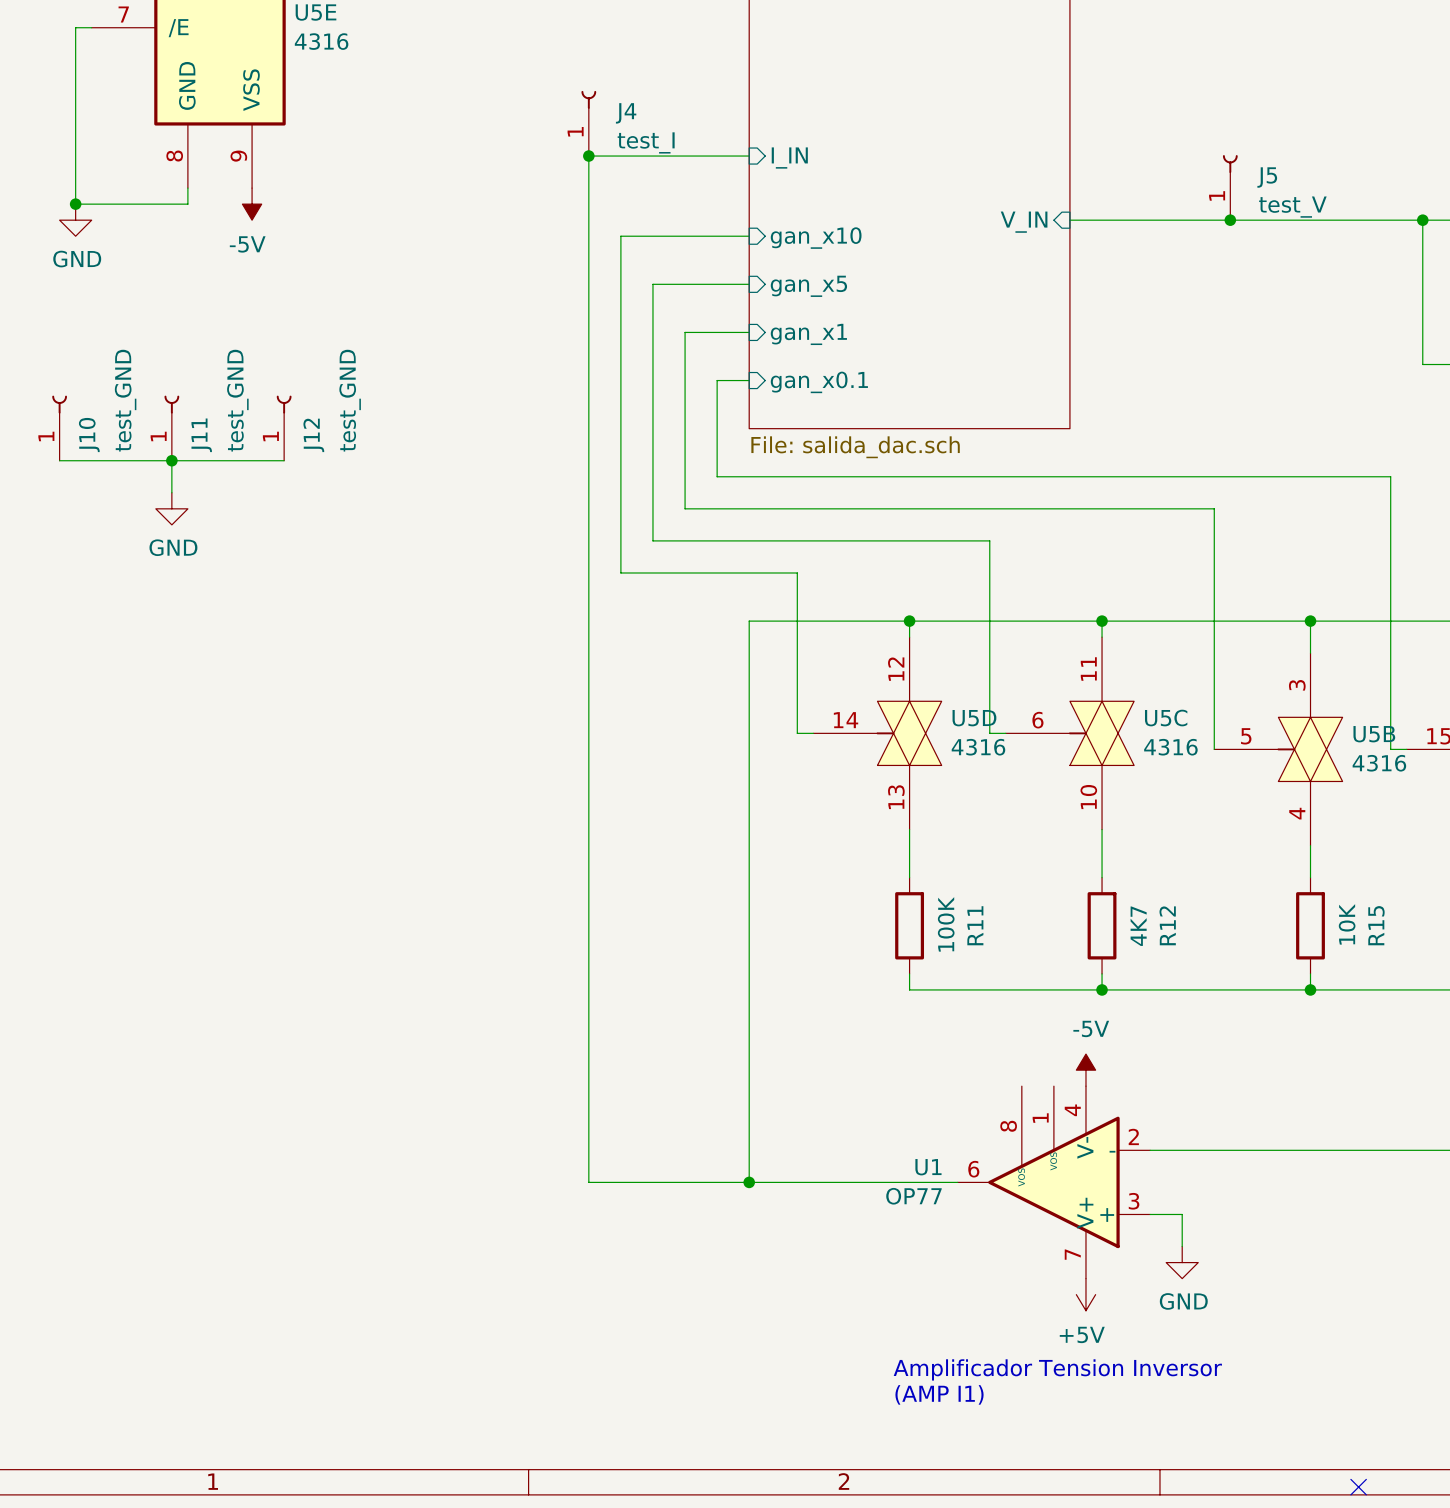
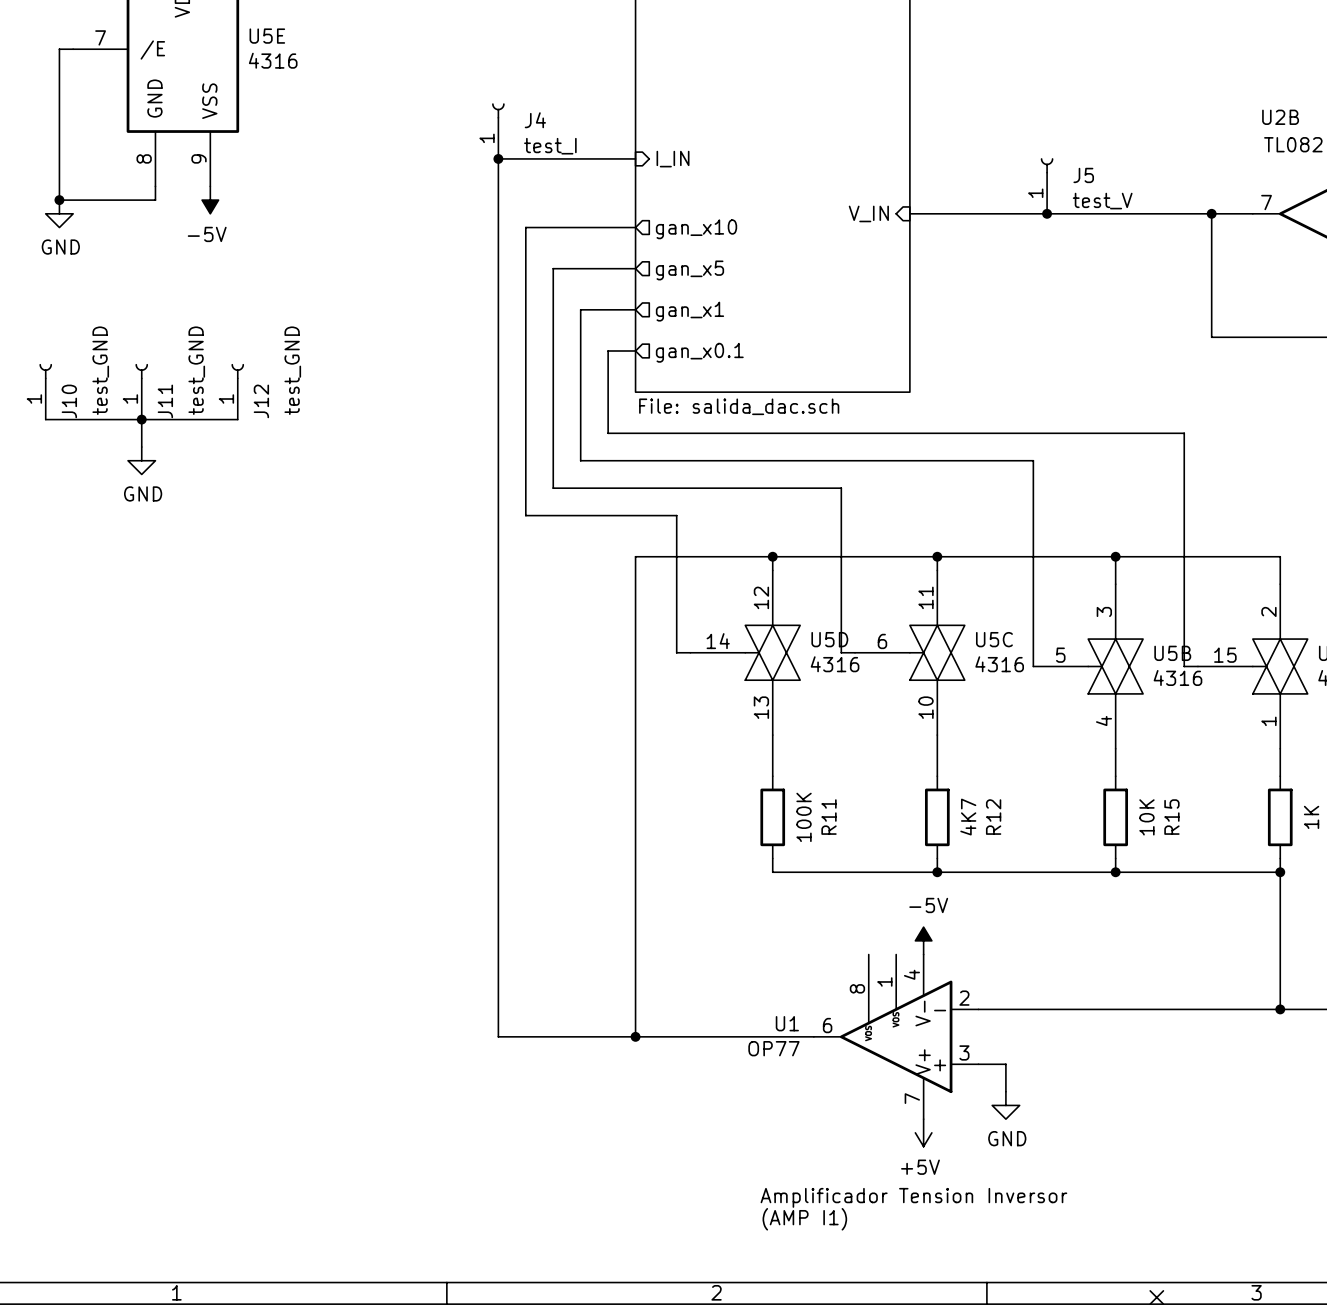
sheet pin shape: input (816, 238) -> output (696, 229)
sheet pin shape: input (808, 286) -> output (689, 270)
sheet pin shape: input (808, 334) -> output (689, 311)
sheet pin shape: input (819, 382) -> output (699, 352)

